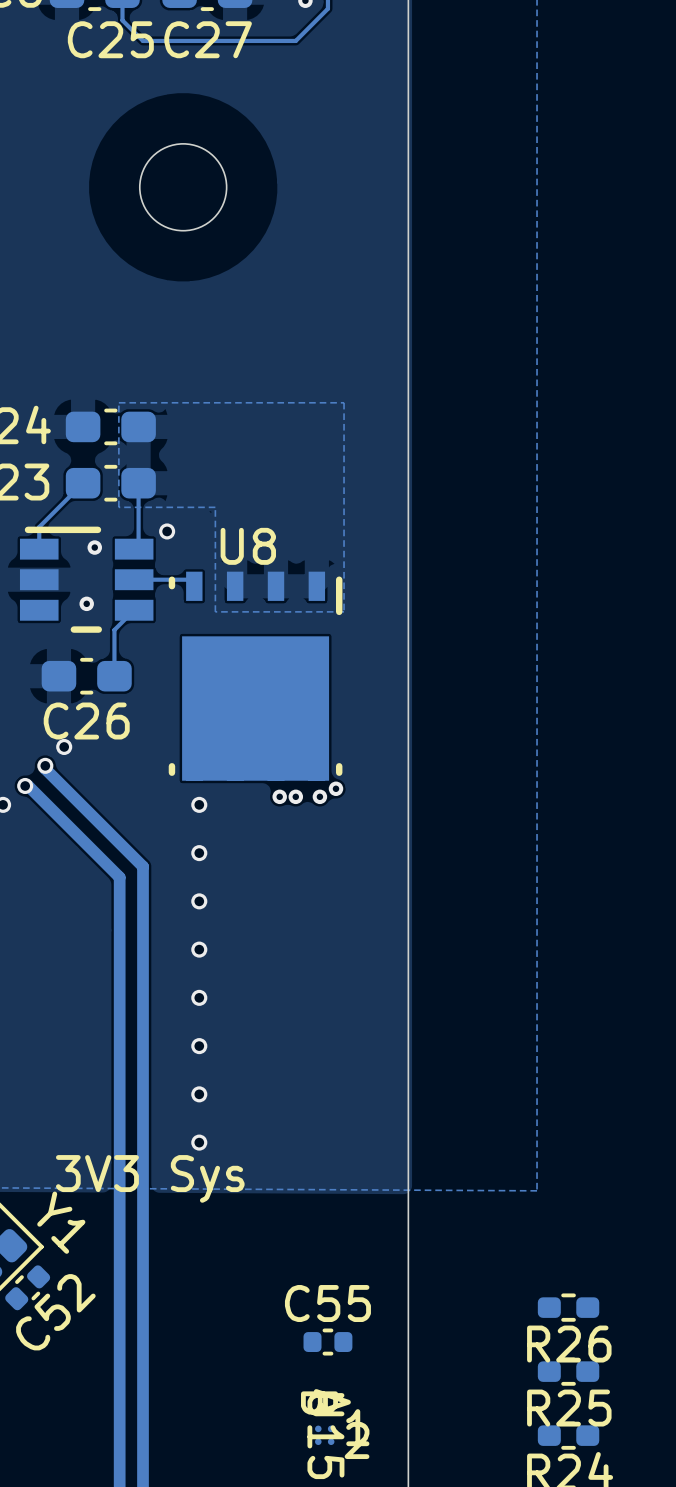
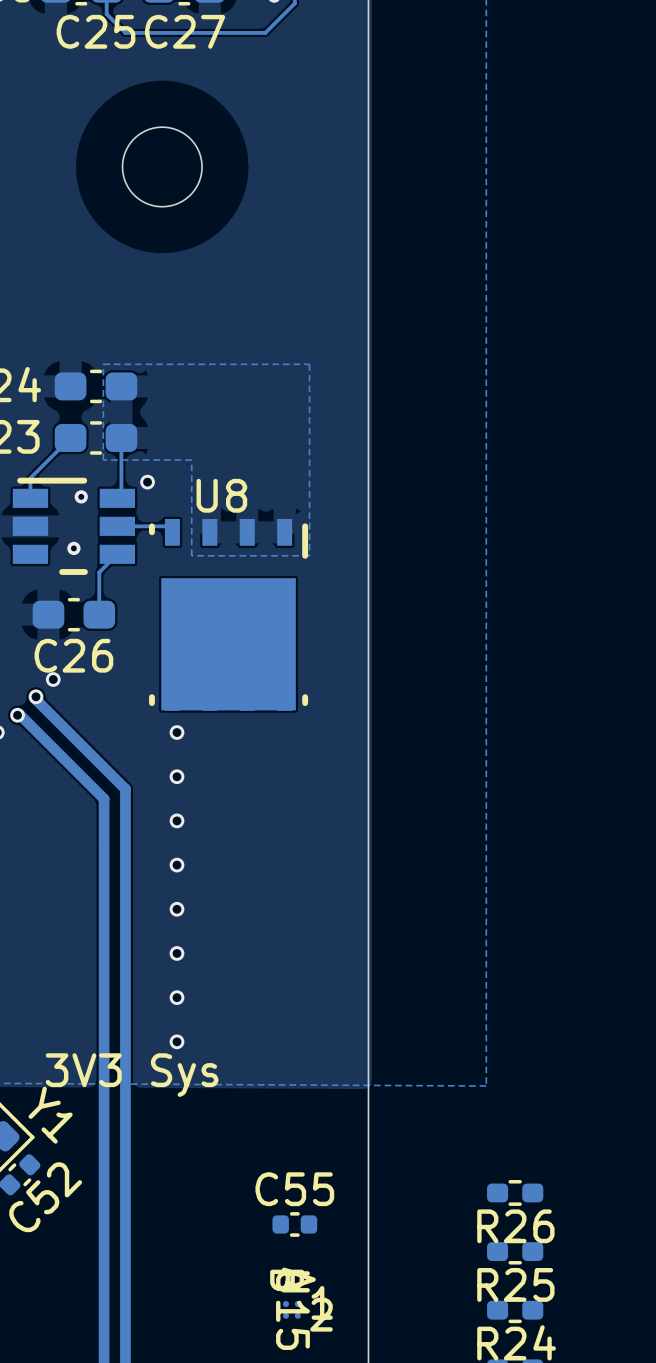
via: (335, 788) -> none
via: (279, 796) -> none
via: (295, 796) -> none
via: (319, 796) -> none

